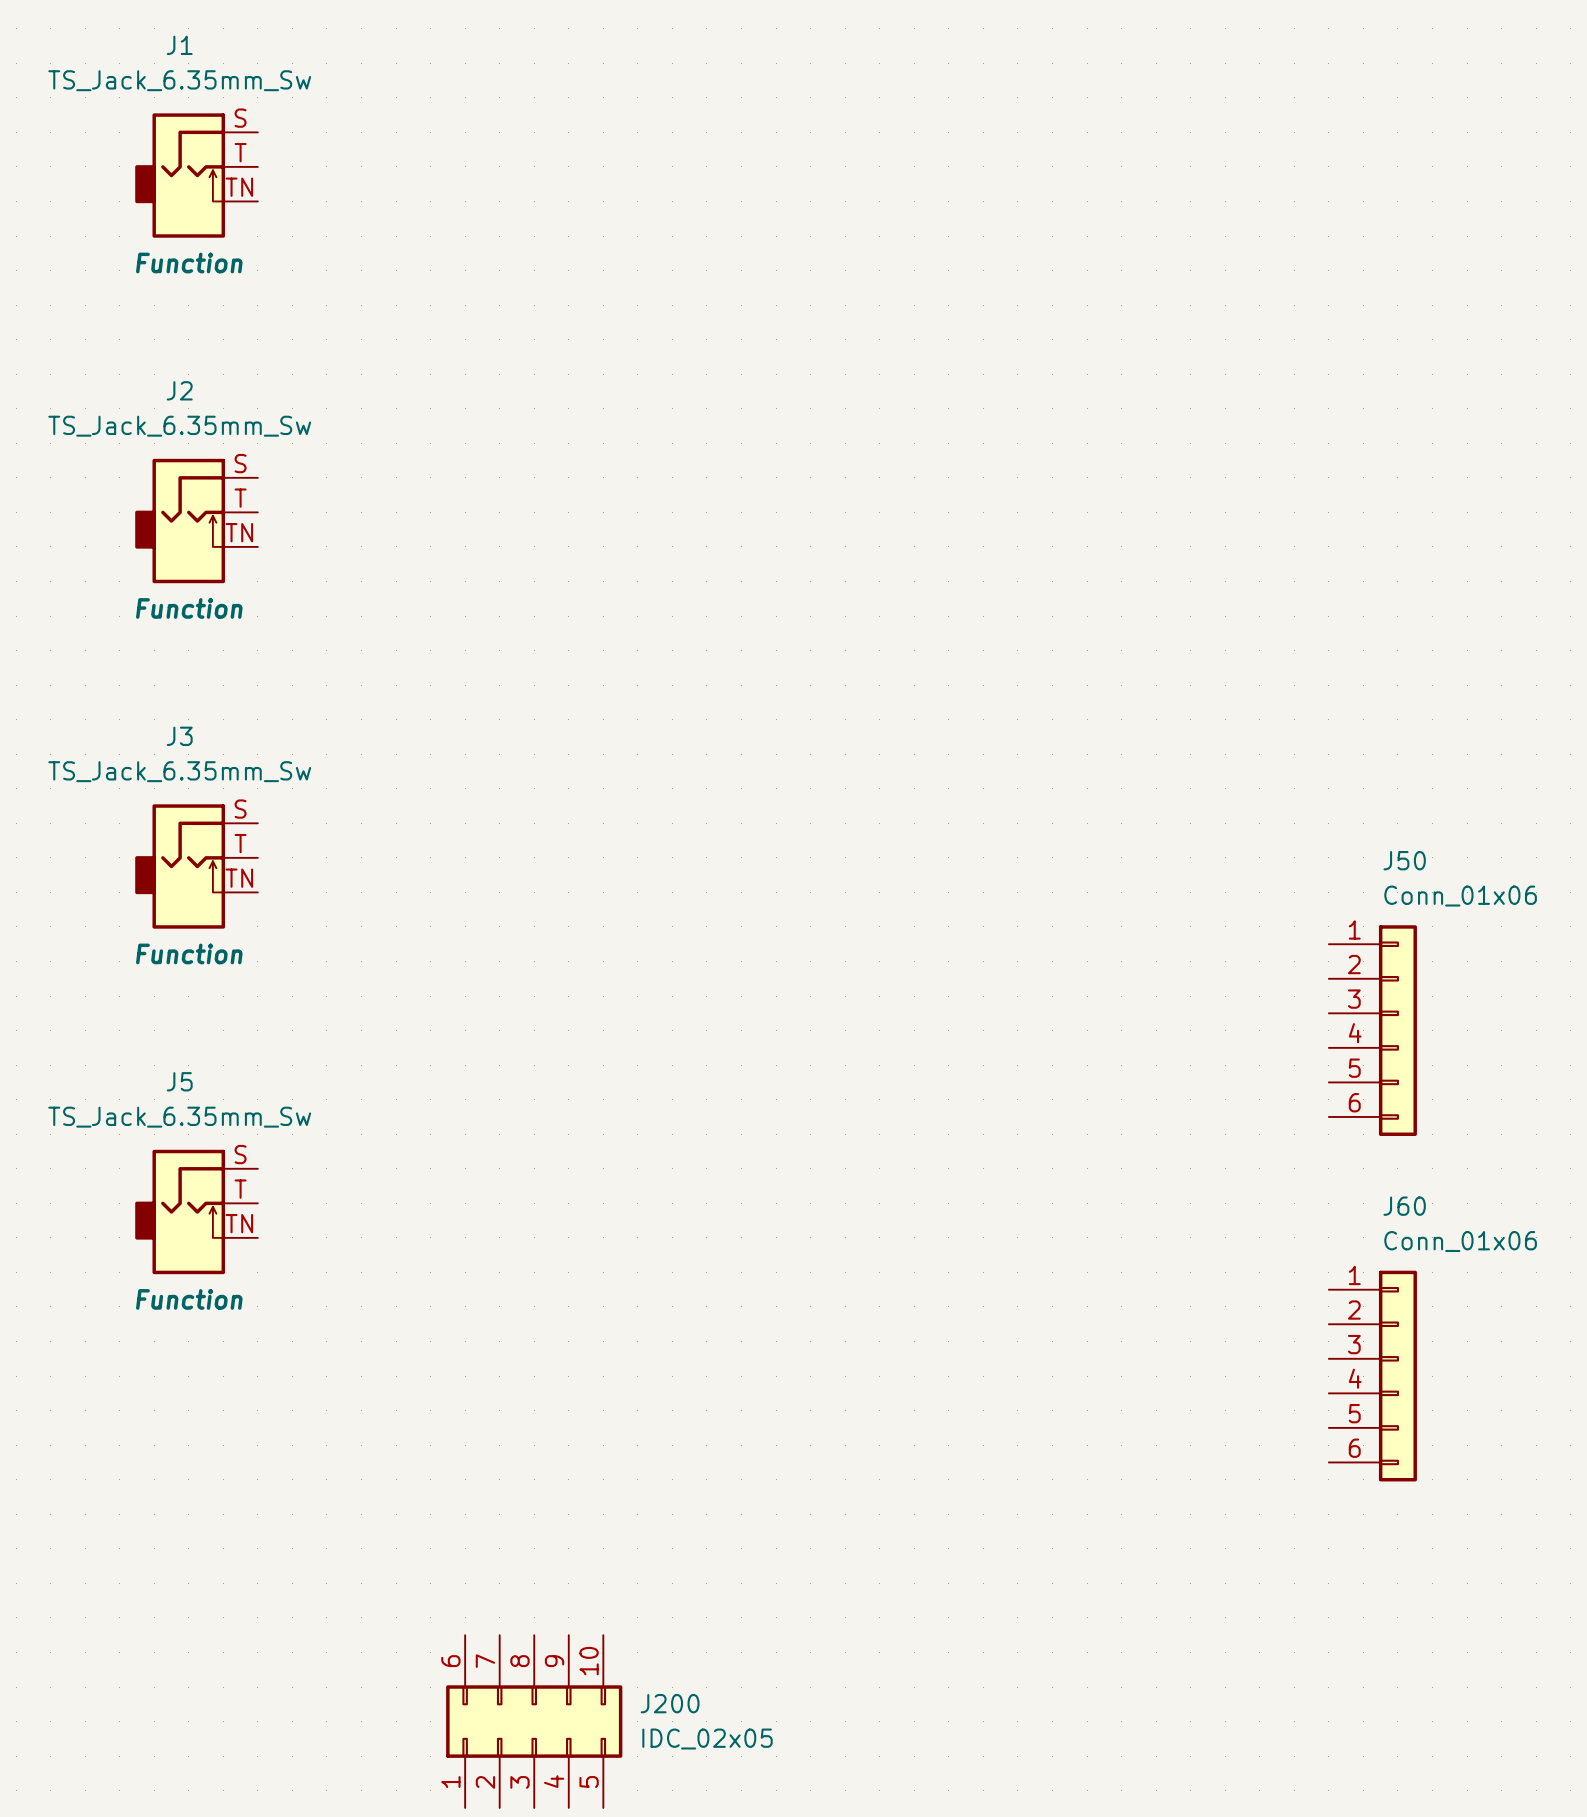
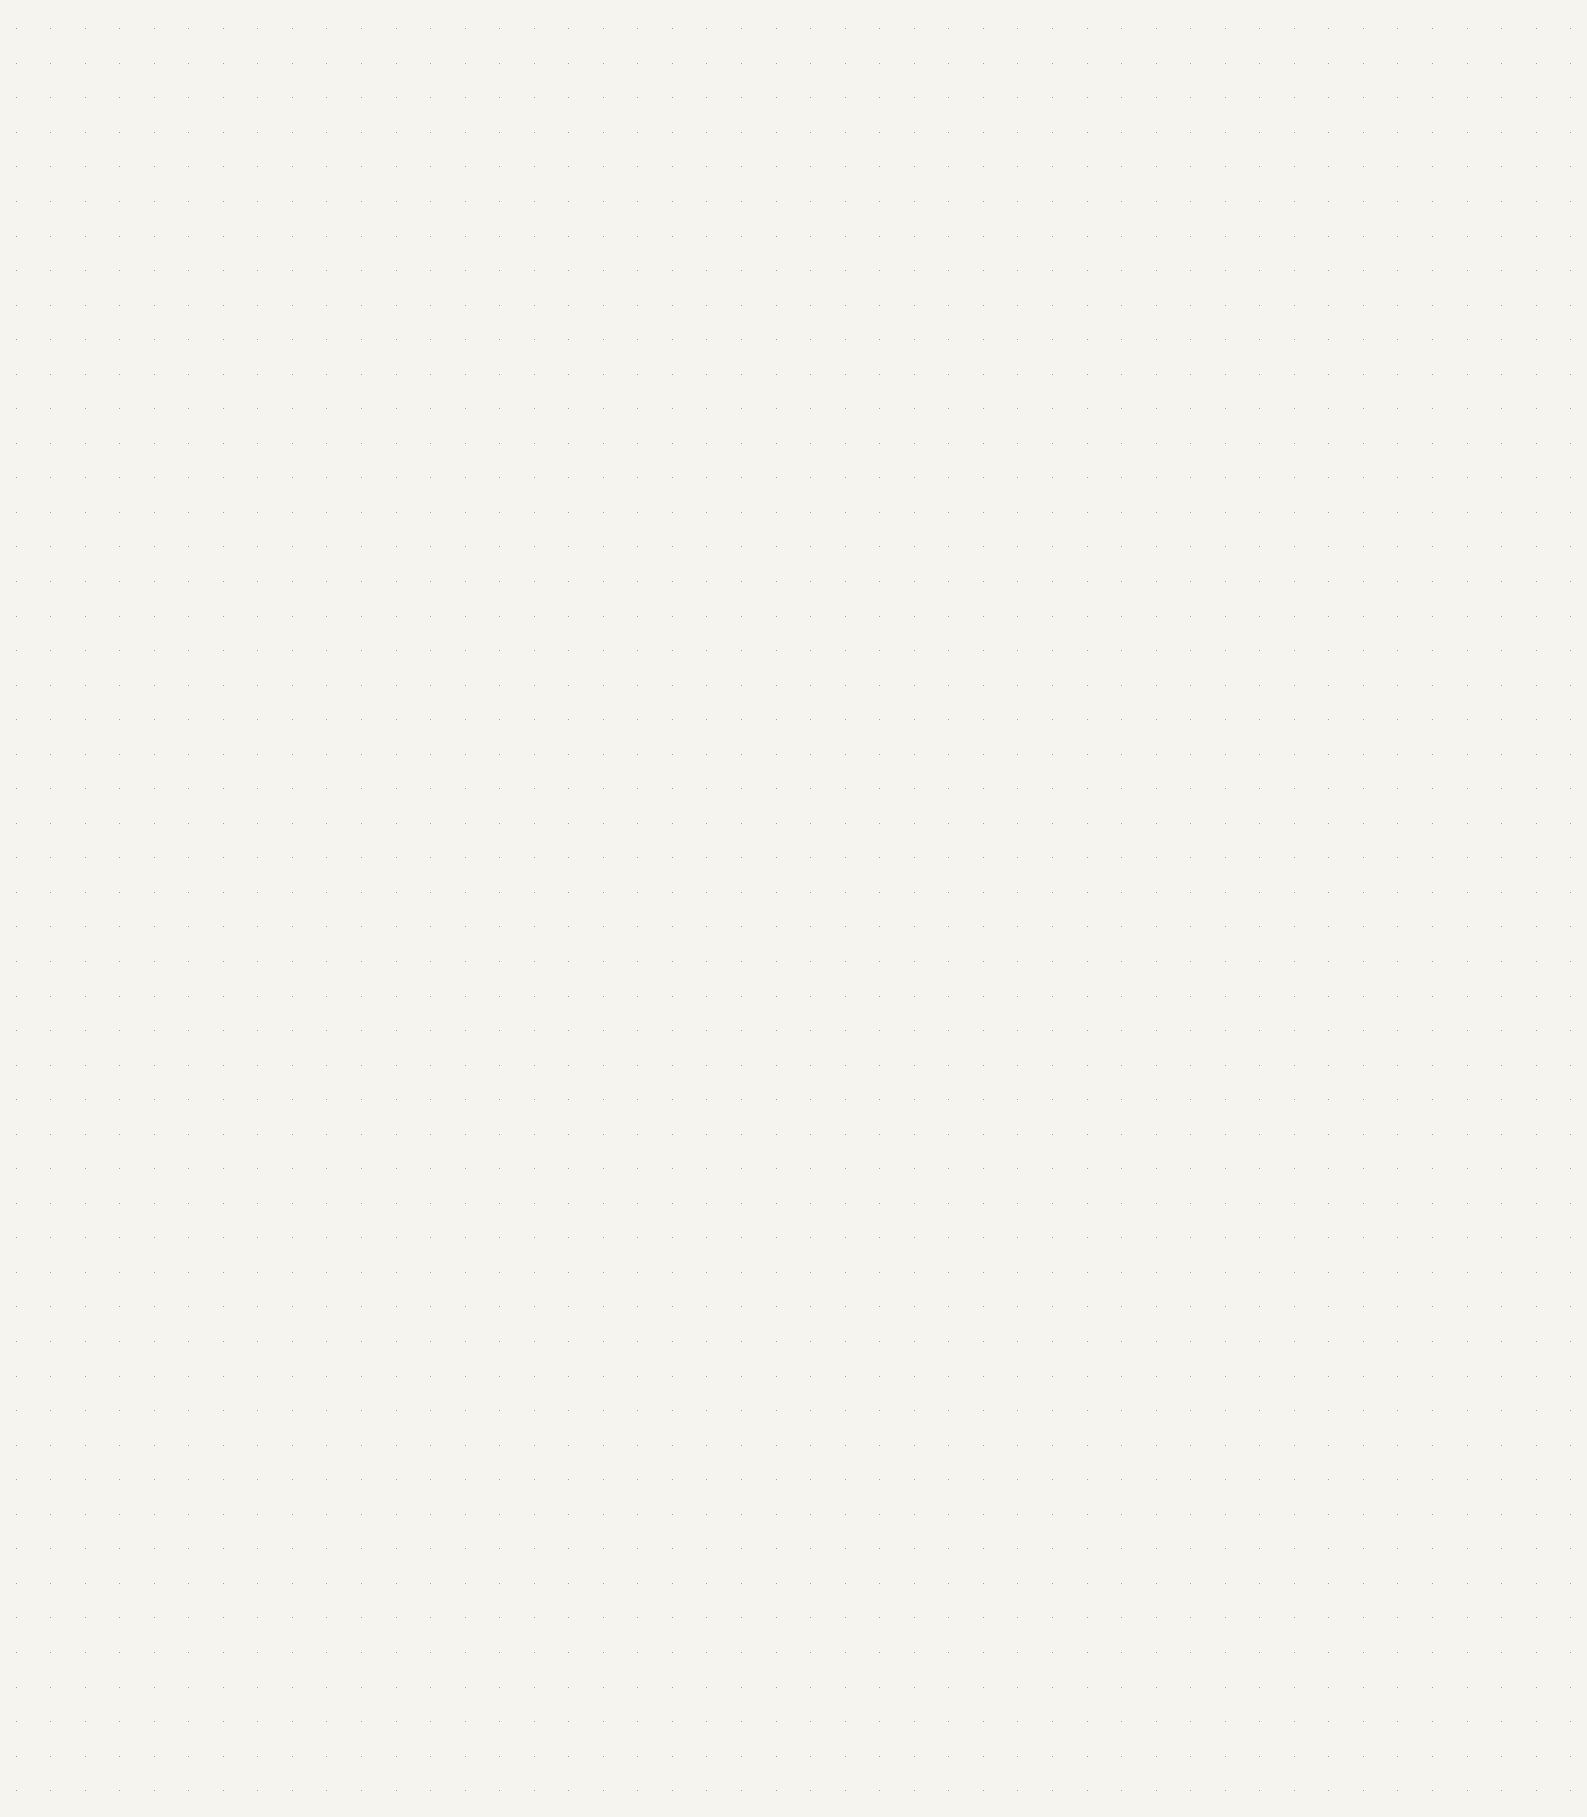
J1: TS_Jack_6.35mm_Sw (196, 175) -> none
J2: TS_Jack_6.35mm_Sw (196, 521) -> none
J3: TS_Jack_6.35mm_Sw (196, 866) -> none
J50: Conn_01x06 (1372, 1030) -> none
J5: TS_Jack_6.35mm_Sw (196, 1211) -> none
J60: Conn_01x06 (1372, 1376) -> none
J200: IDC_02x05 (534, 1721) -> none

